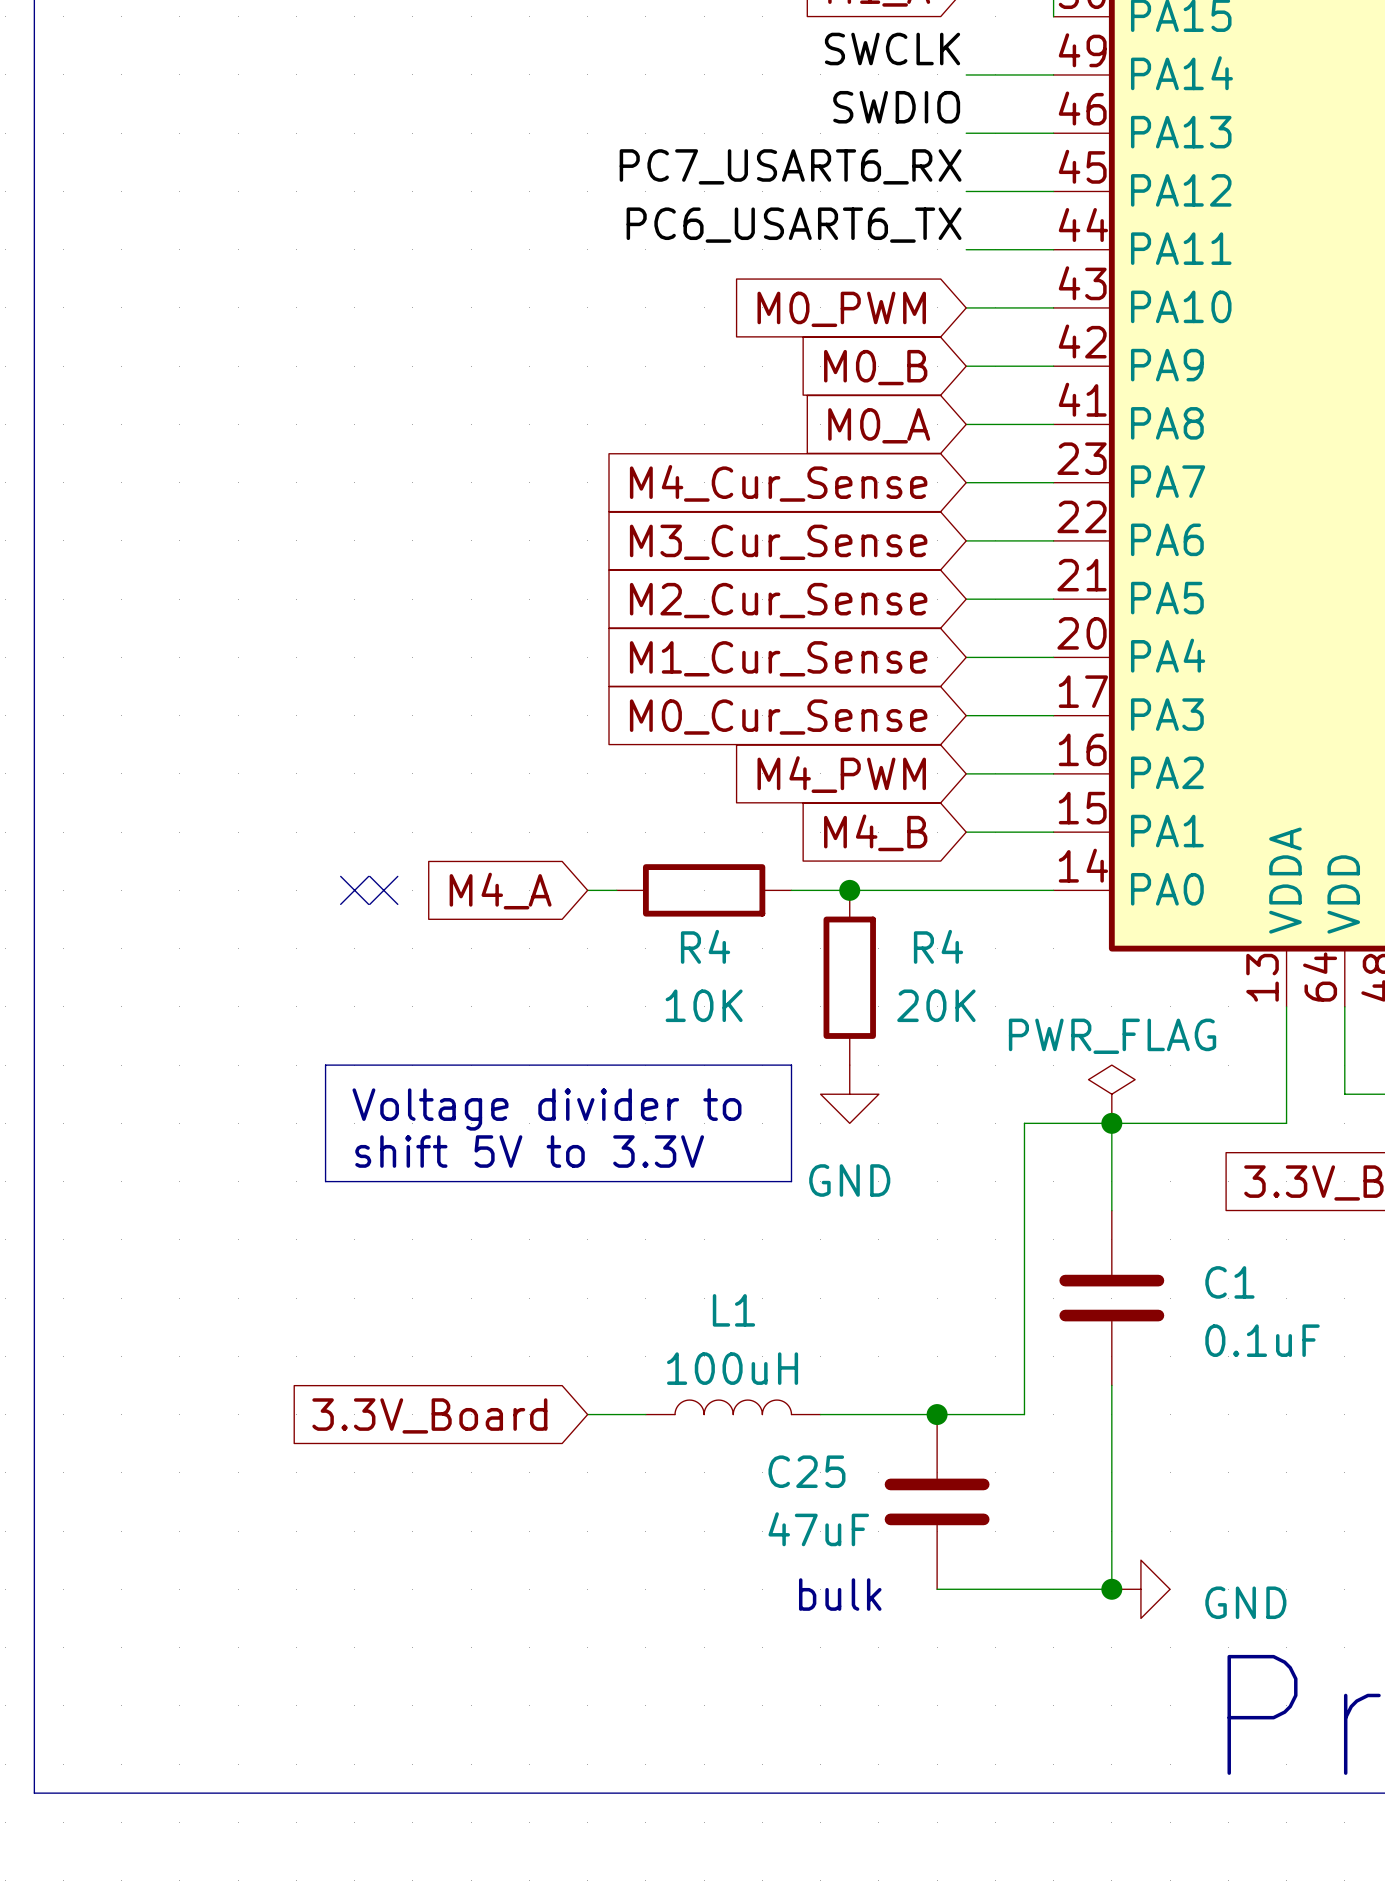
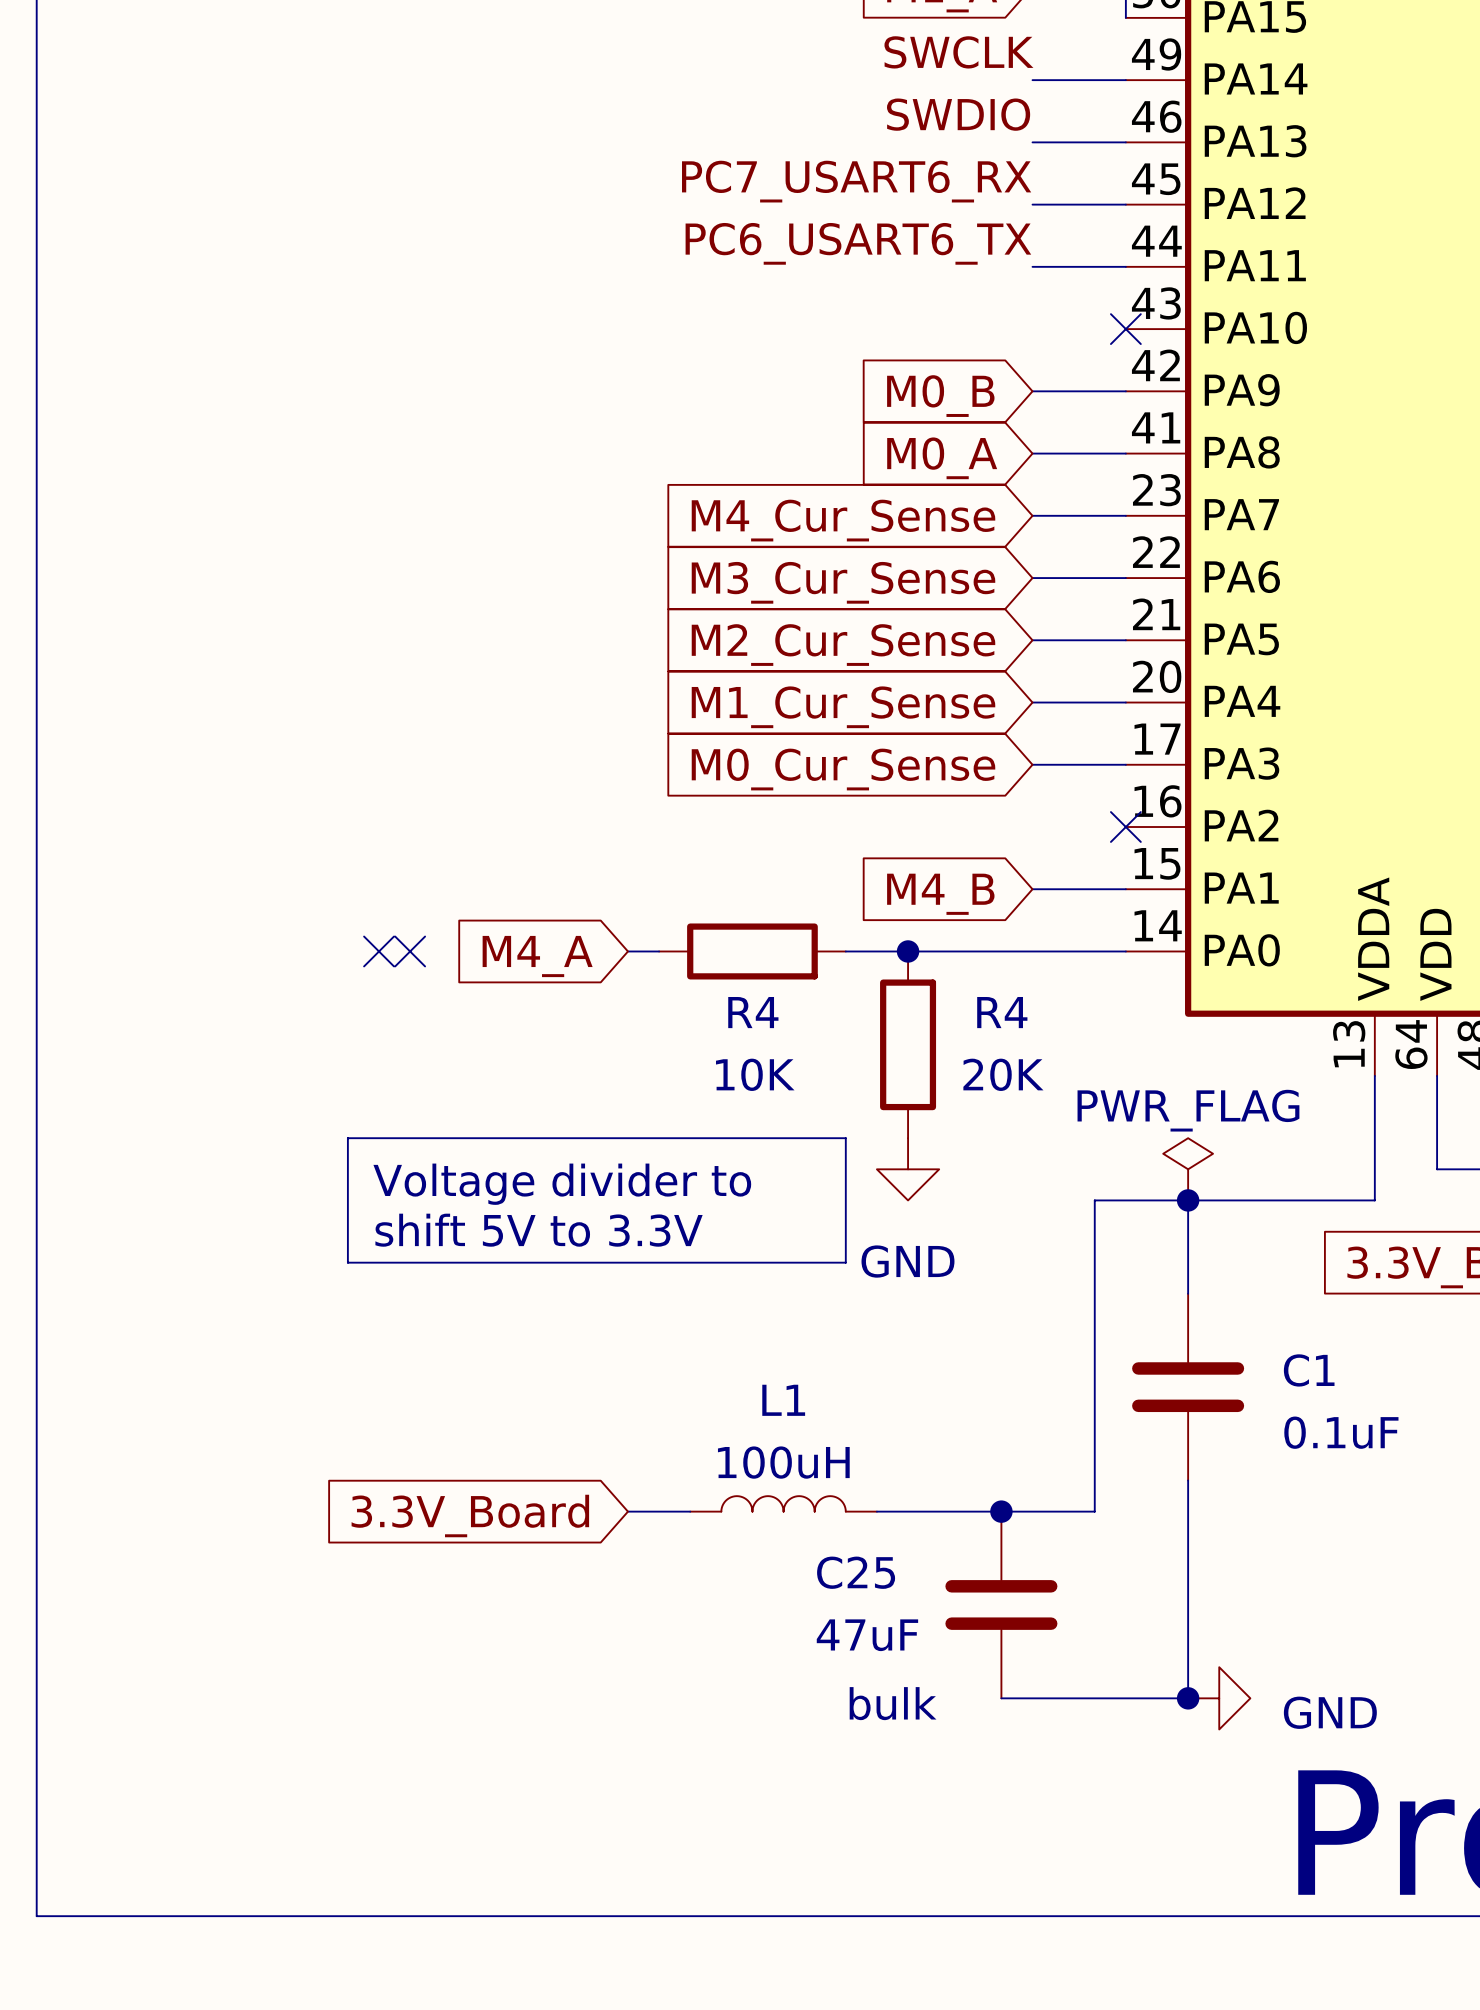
wire: (966, 307) (1053, 307) -> none
no-connect mark: none -> (1125, 329)
global label: M0_PWM (841, 309) -> none
wire: (966, 773) (1053, 773) -> none
no-connect mark: none -> (1125, 827)
global label: M4_PWM (841, 774) -> none

